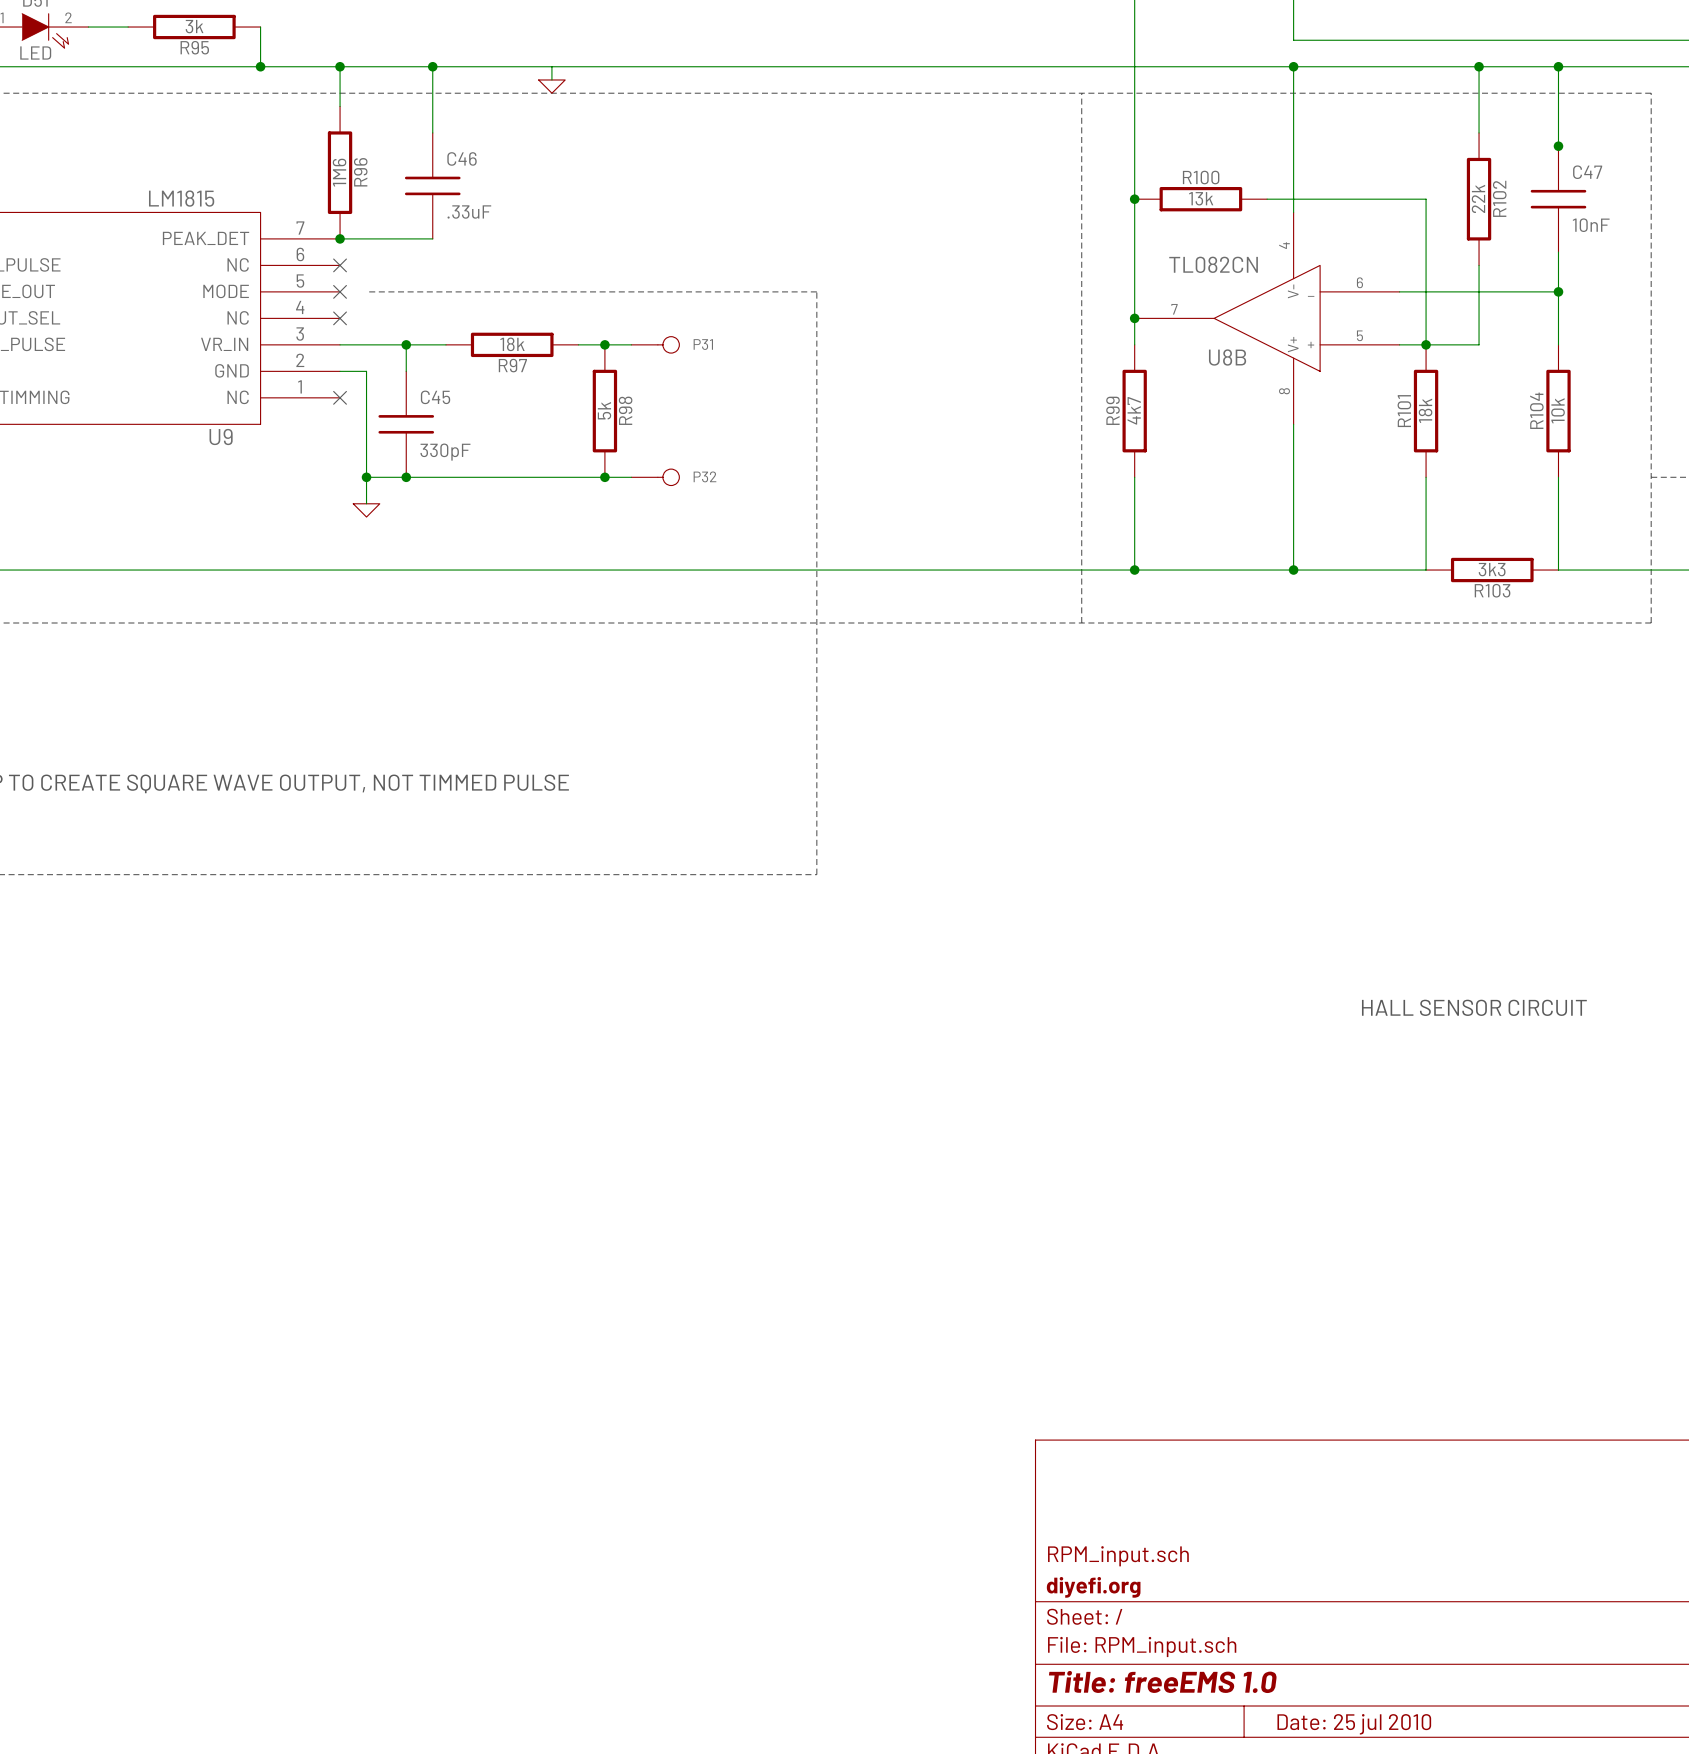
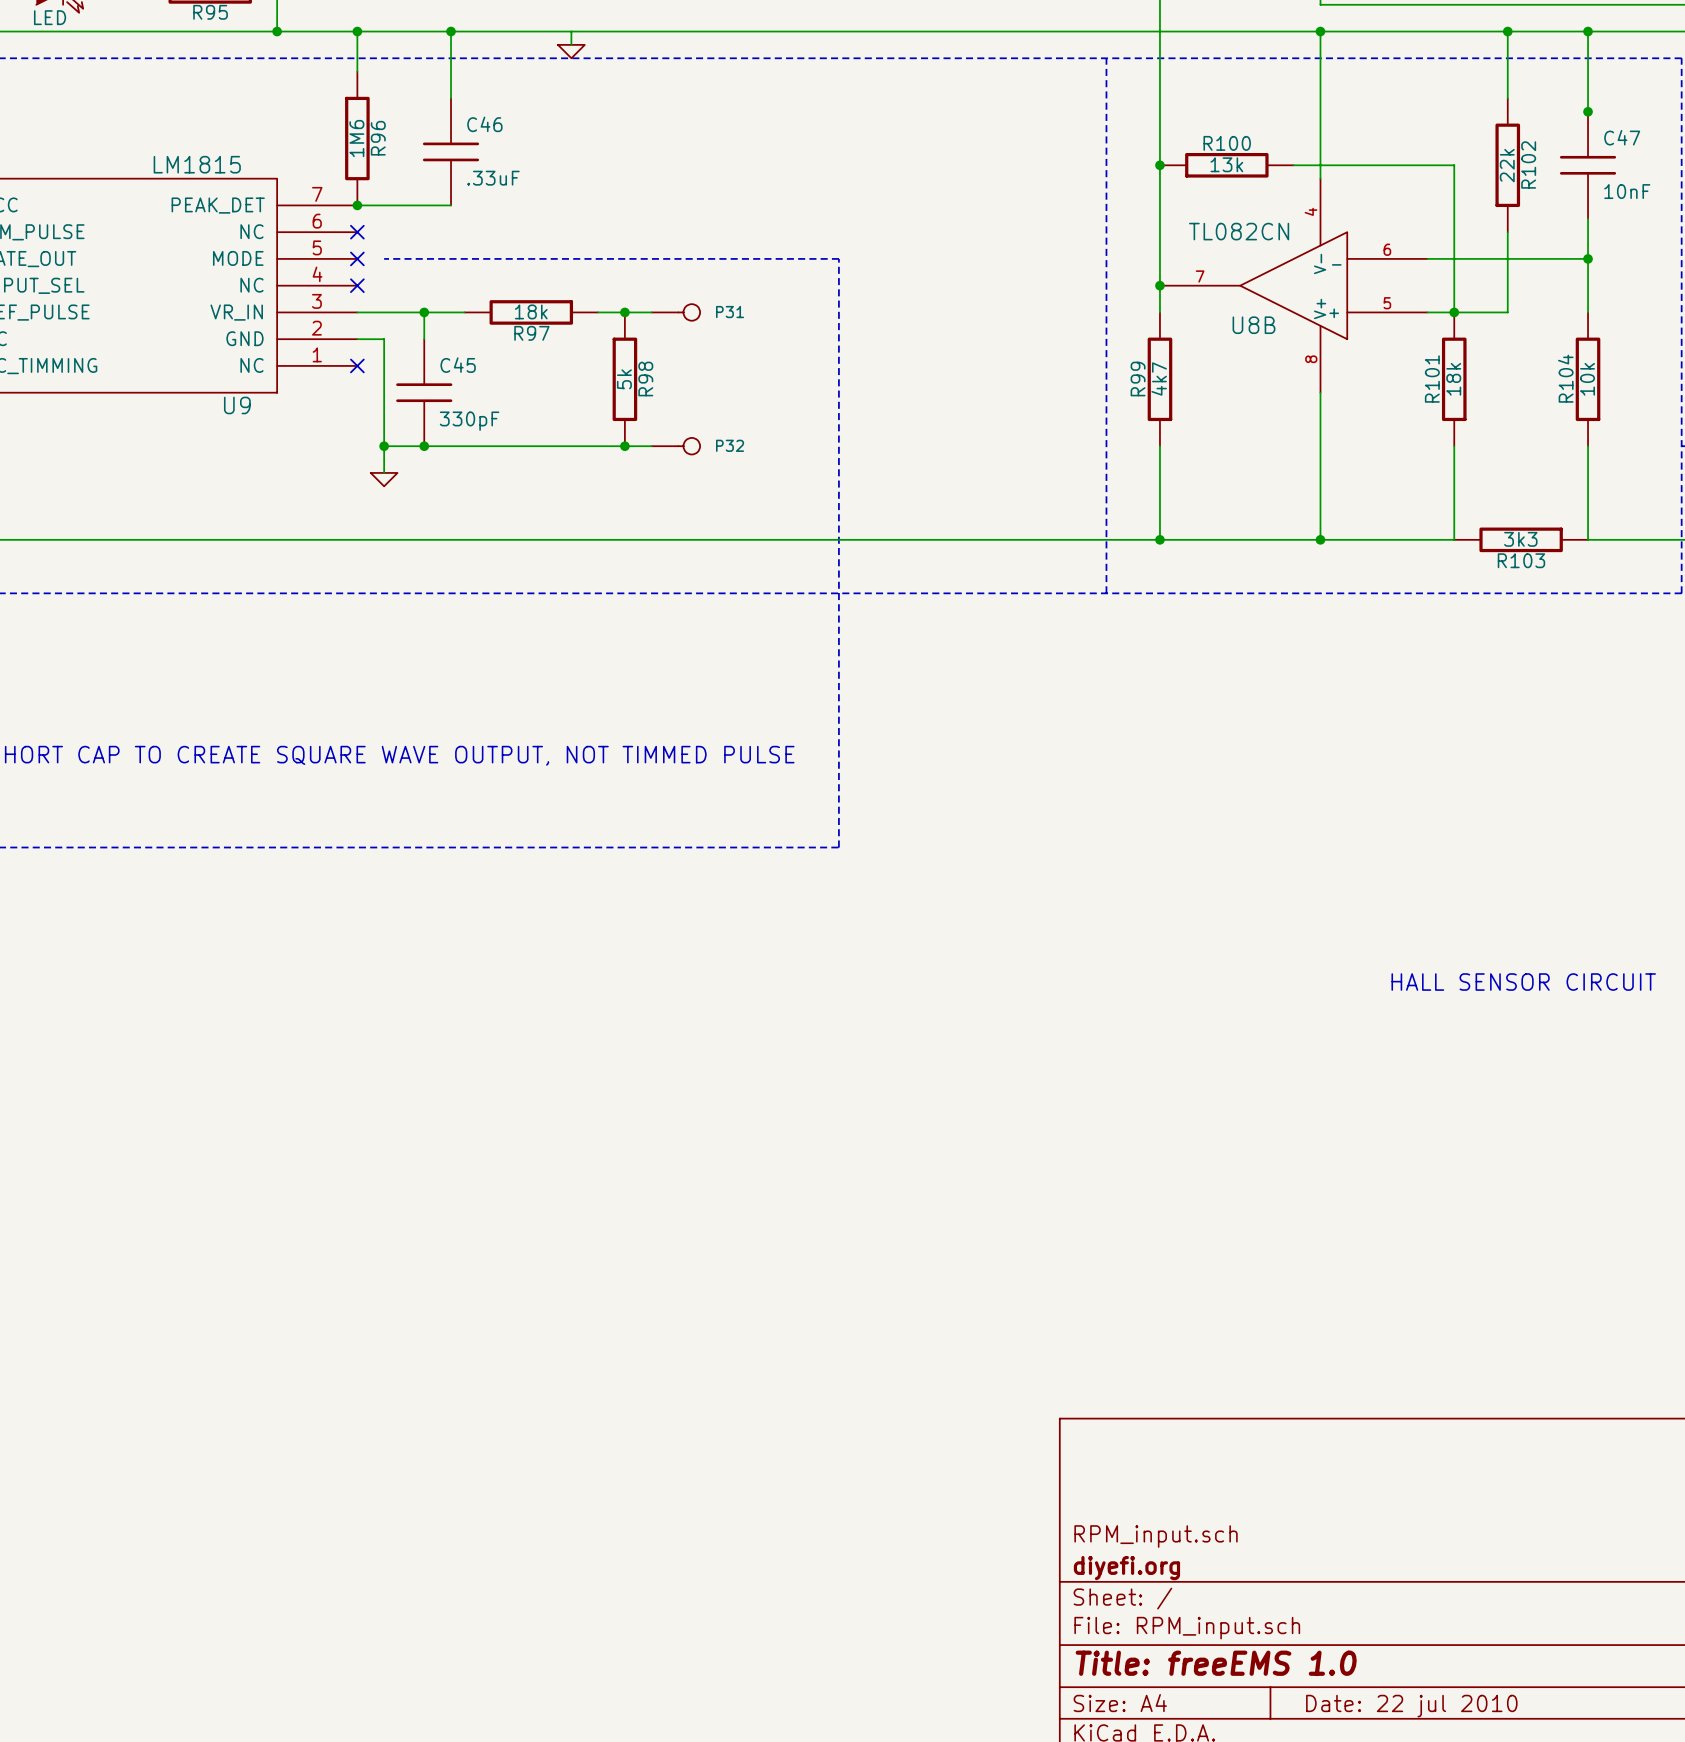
title block: Date: 25 jul 2010 (1354, 1724) -> Date: 22 jul 2010 (1411, 1706)

